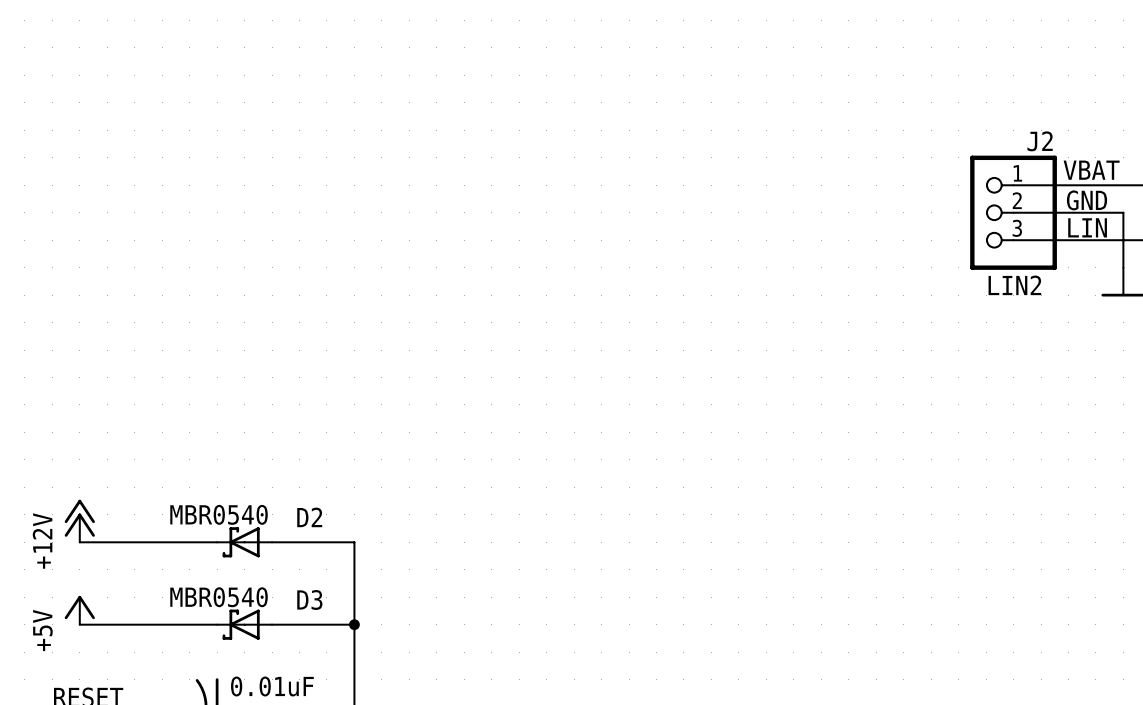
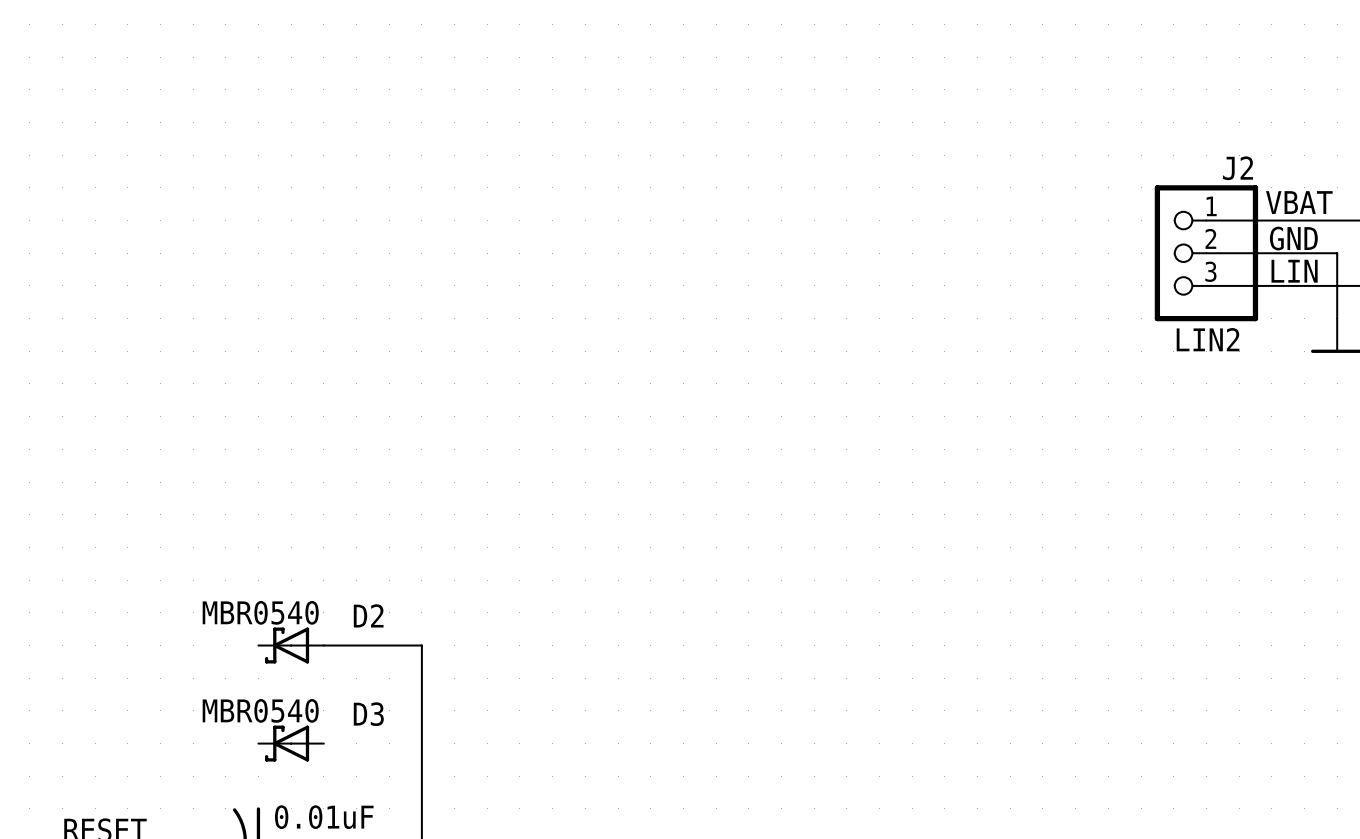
power symbol: +12V (79, 521) -> none
wire: (79, 542) (217, 542) -> none
power symbol: +5V (79, 610) -> none
wire: (79, 624) (217, 624) -> none
wire: (272, 624) (354, 624) -> none
junction: (354, 624) -> none

